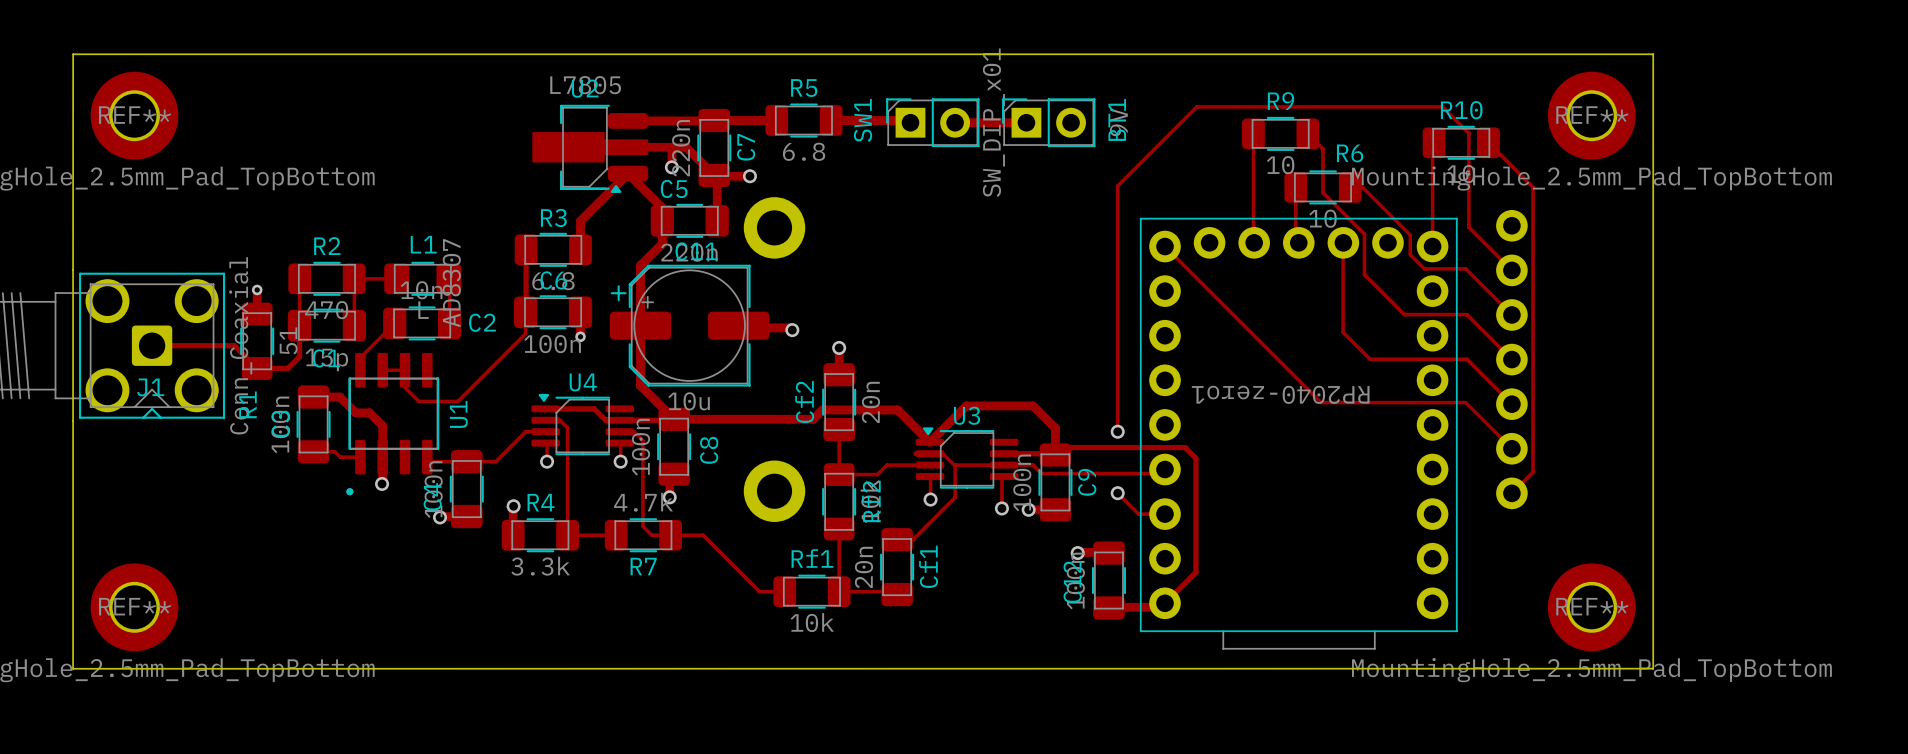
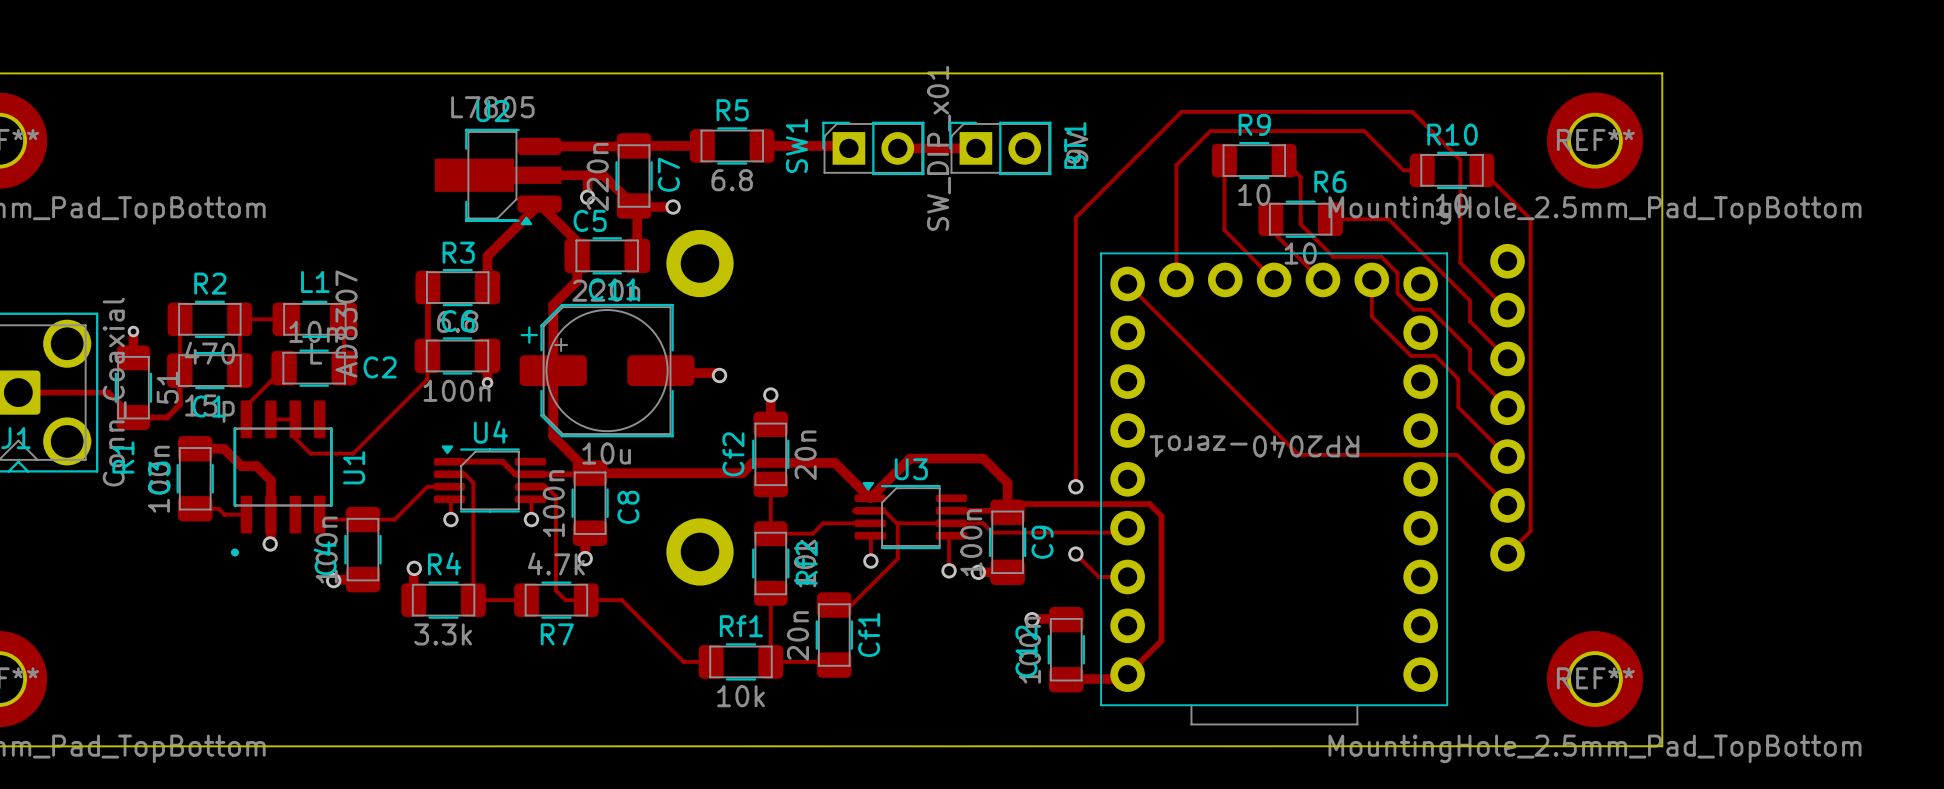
track: (1196, 106) (1240, 106) -> (1176, 279) (1176, 165) (1210, 131)
track: none -> (1162, 131) (1181, 111) (1412, 111) (1431, 131)
track: (1381, 106) (1442, 106) -> (1364, 131) (1403, 170) (1422, 170)
track: (1432, 144) (1432, 246) -> none
track: (1362, 187) (1410, 235) (1410, 254) (1424, 268) (1465, 268) (1477, 280) -> (1344, 219) (1388, 219) (1470, 300) (1470, 321)
track: (1323, 192) (1364, 234) (1364, 274) (1404, 314) (1466, 314) (1477, 325) -> (1300, 217) (1300, 224) (1333, 256) (1381, 256) (1397, 273) (1397, 293) (1413, 309) (1430, 309) (1470, 349) (1470, 370)
track: (1253, 197) (1253, 242) -> (1224, 230) (1274, 279)
track: (1295, 197) (1295, 239) -> (1270, 229) (1322, 279)
track: (1343, 243) (1343, 332) (1370, 359) (1466, 359) -> (1371, 279) (1371, 316) (1411, 355) (1435, 355) (1458, 378) (1458, 407)

